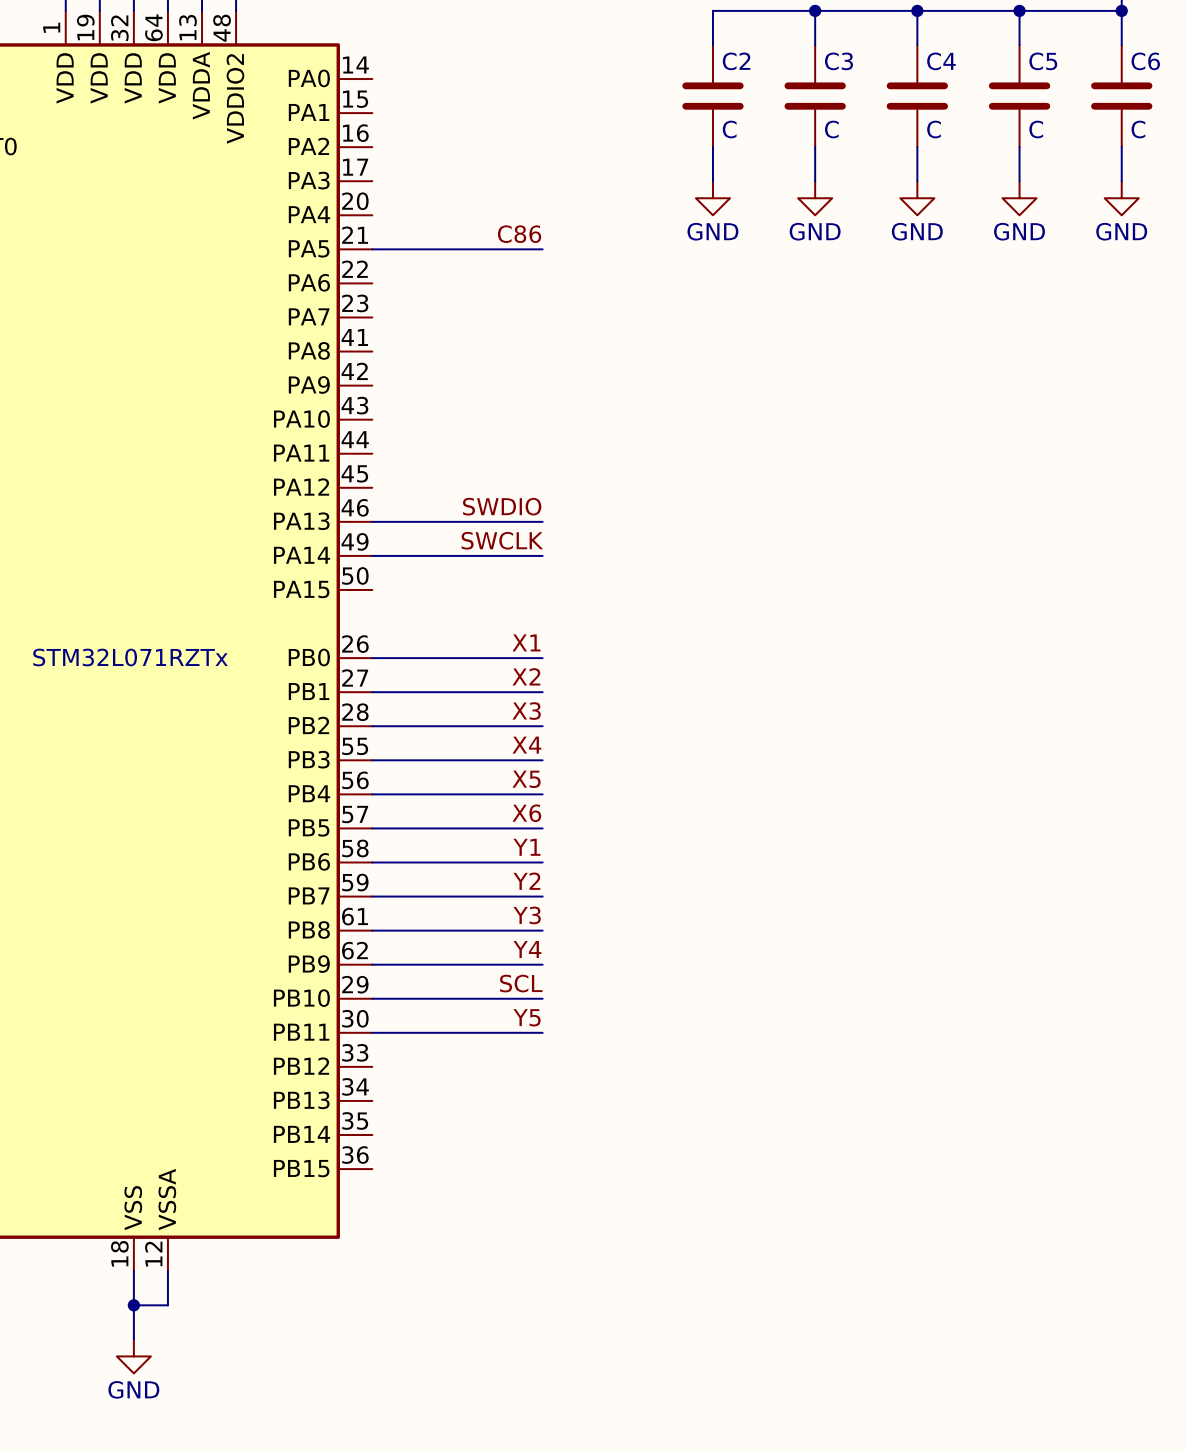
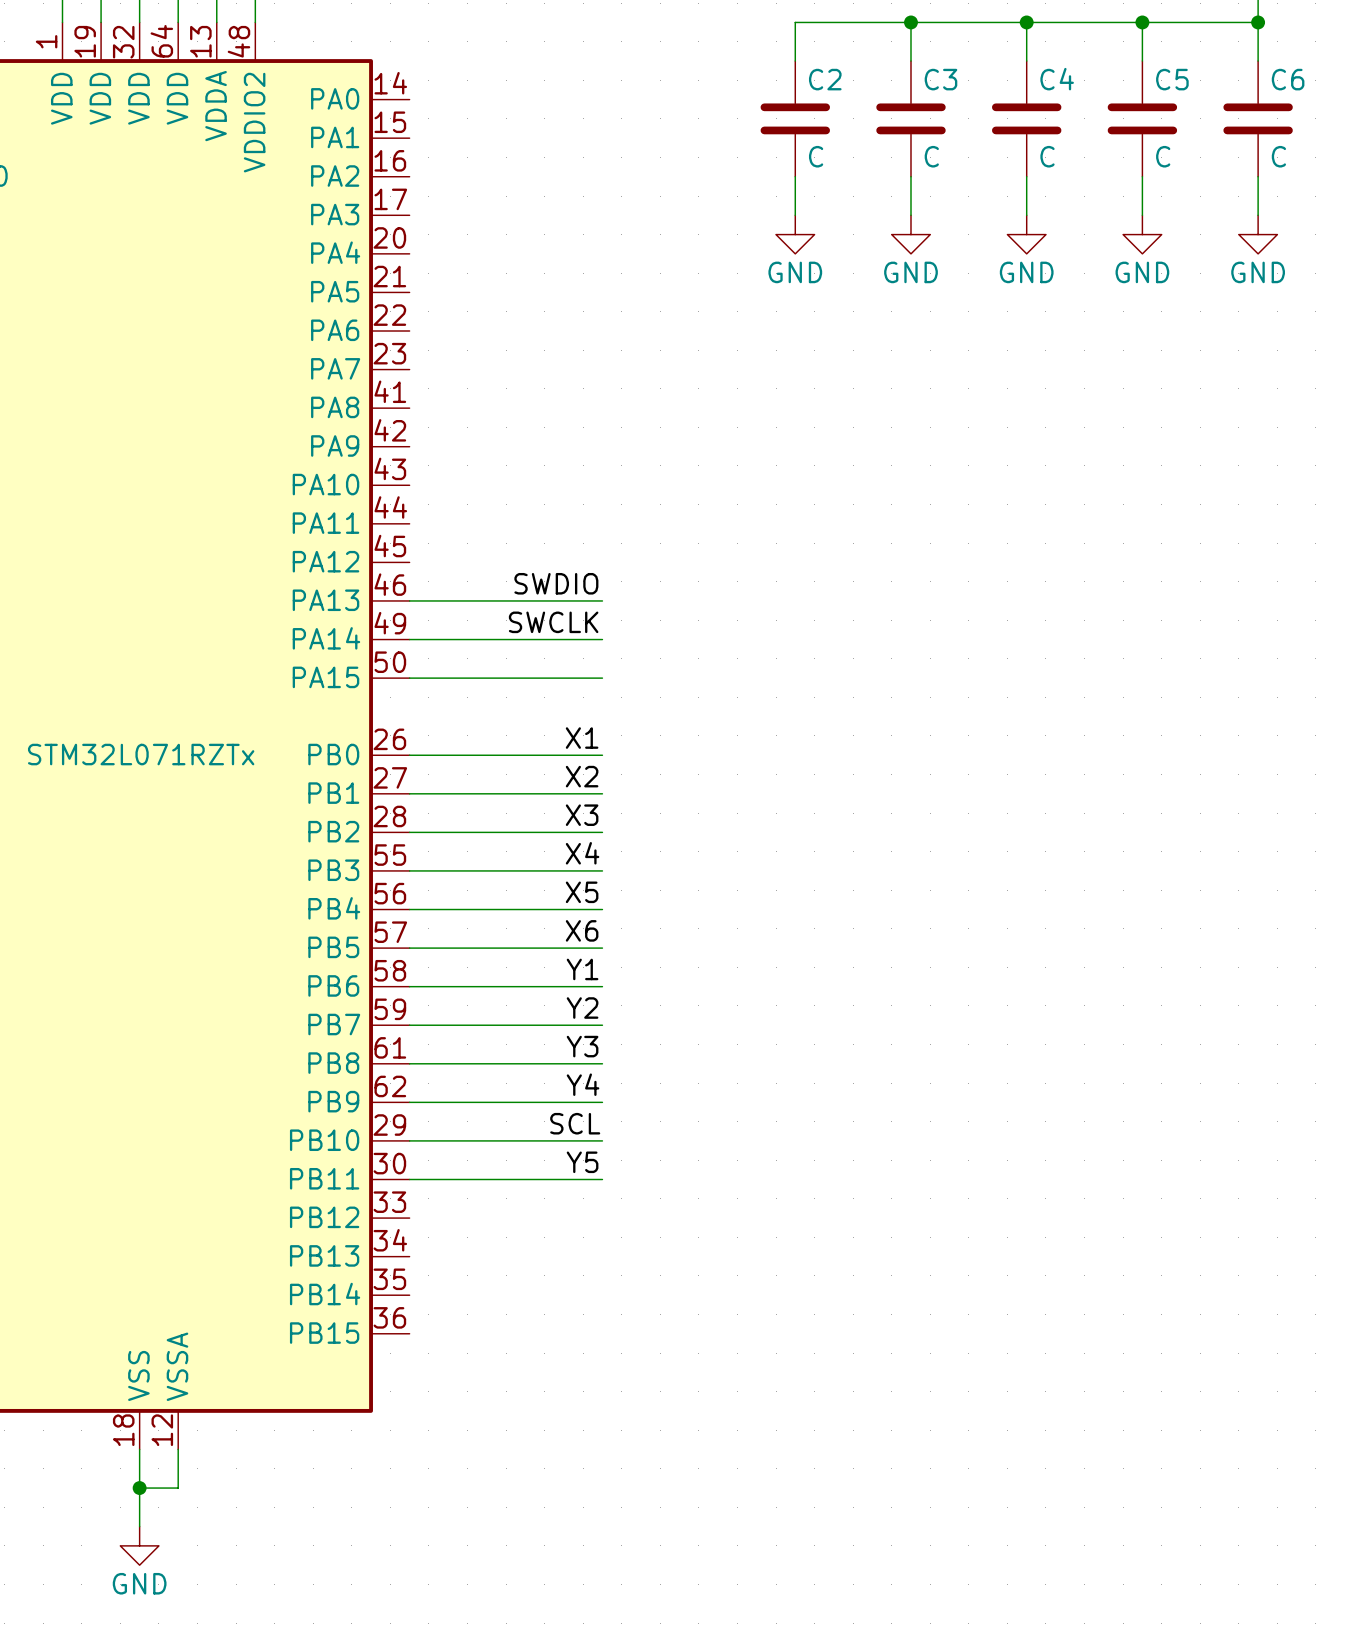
label: C86 (519, 234) -> none
wire: (372, 249) (542, 249) -> none
wire: none -> (409, 678) (602, 678)

